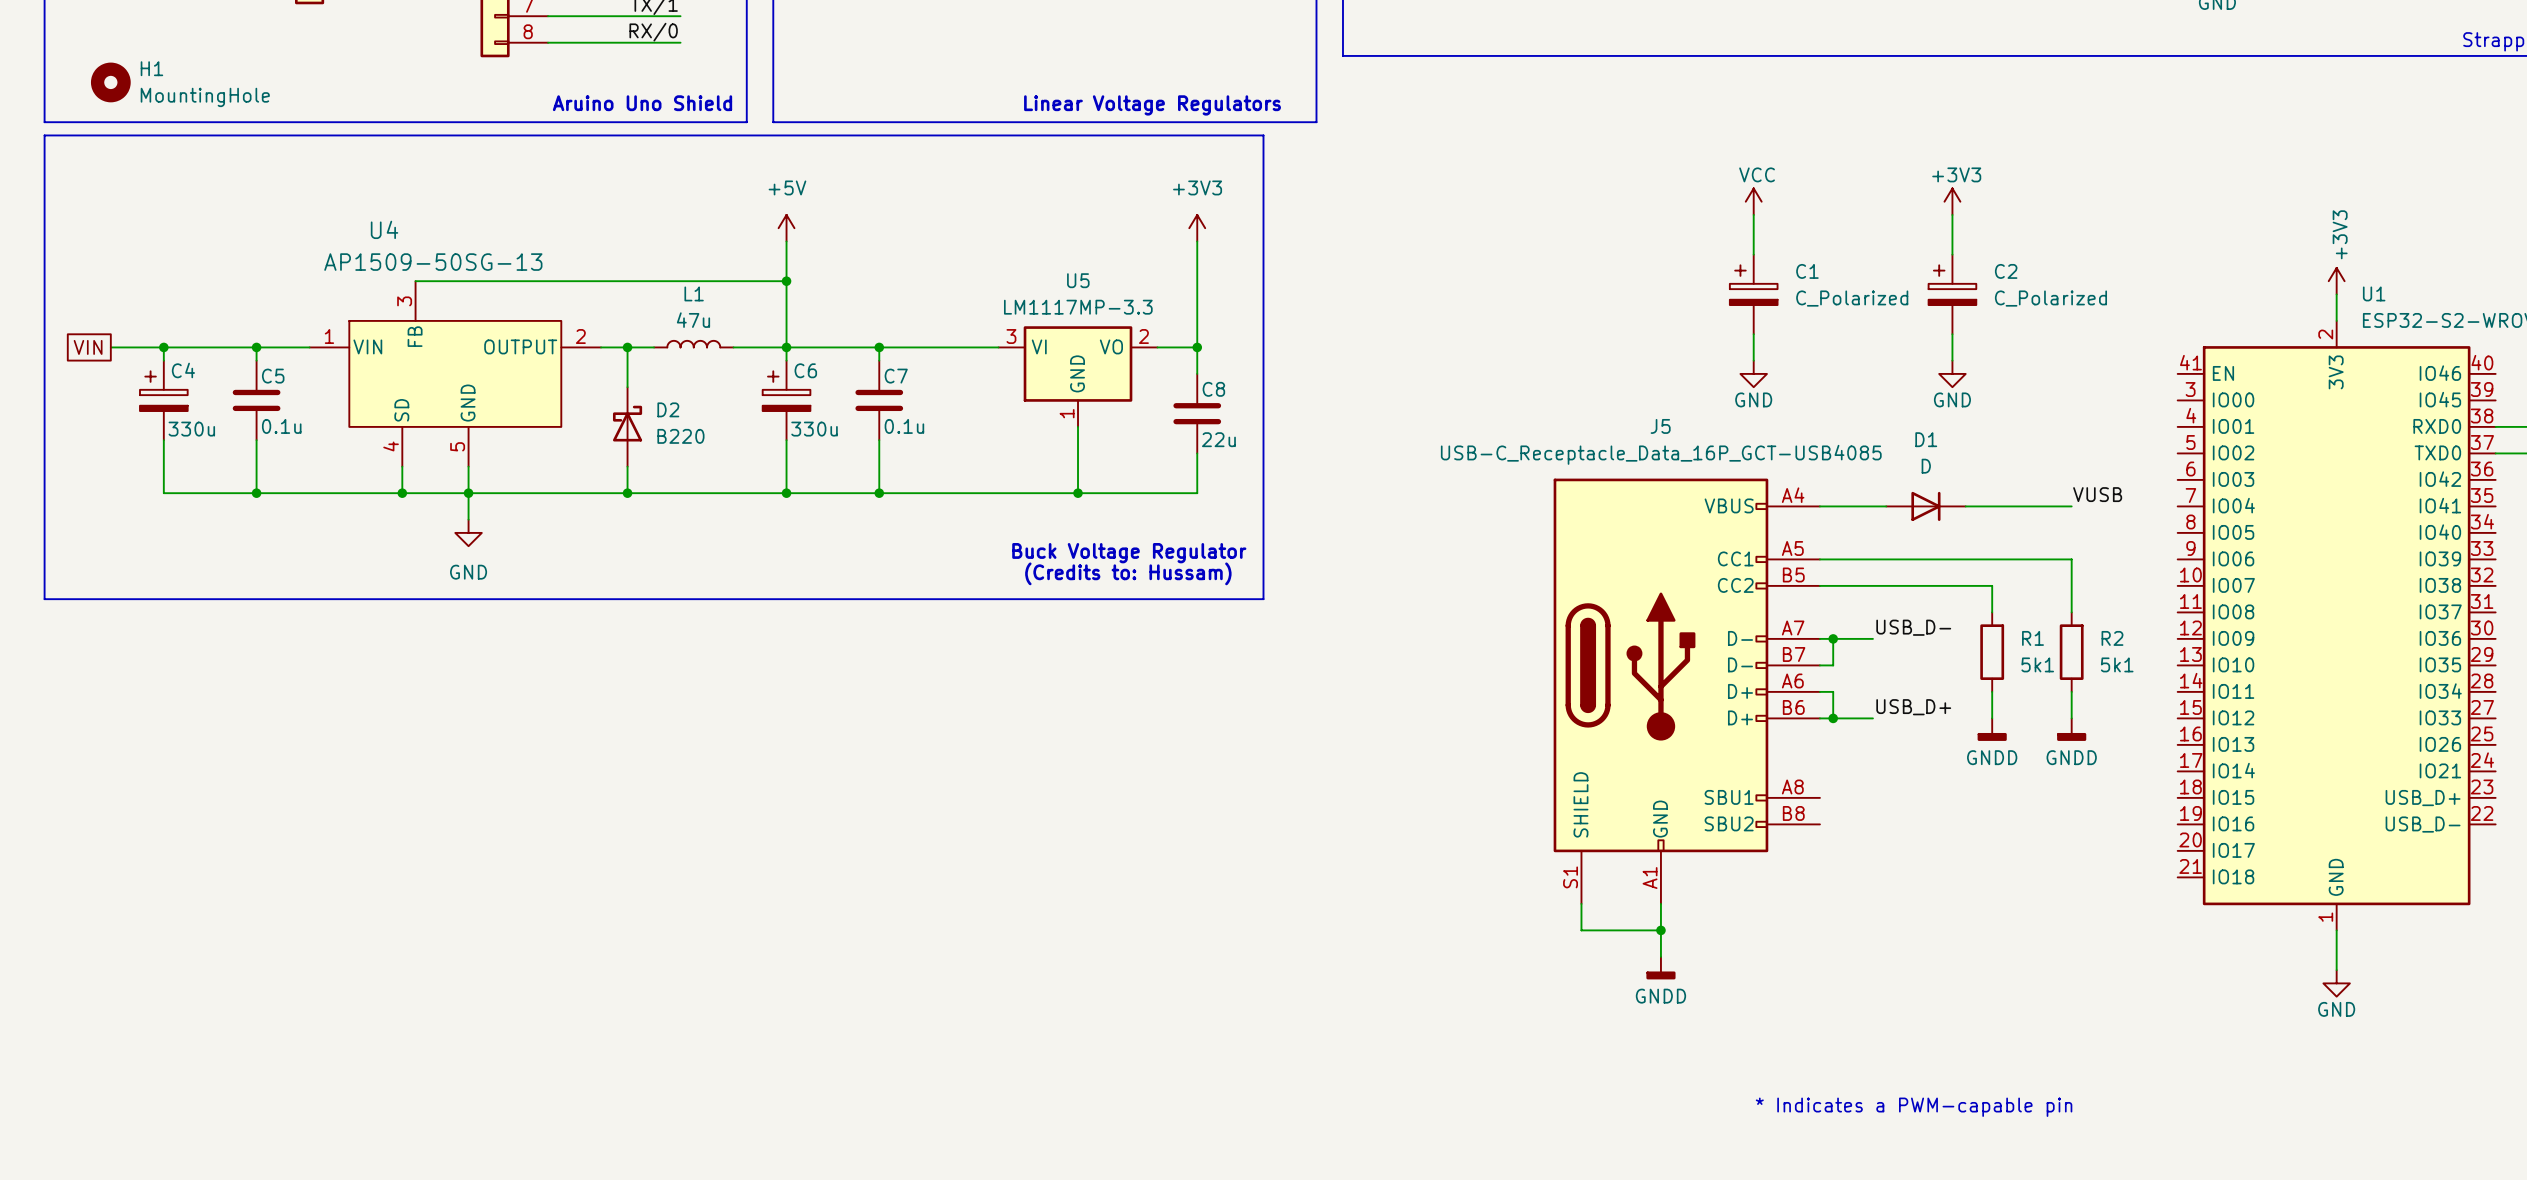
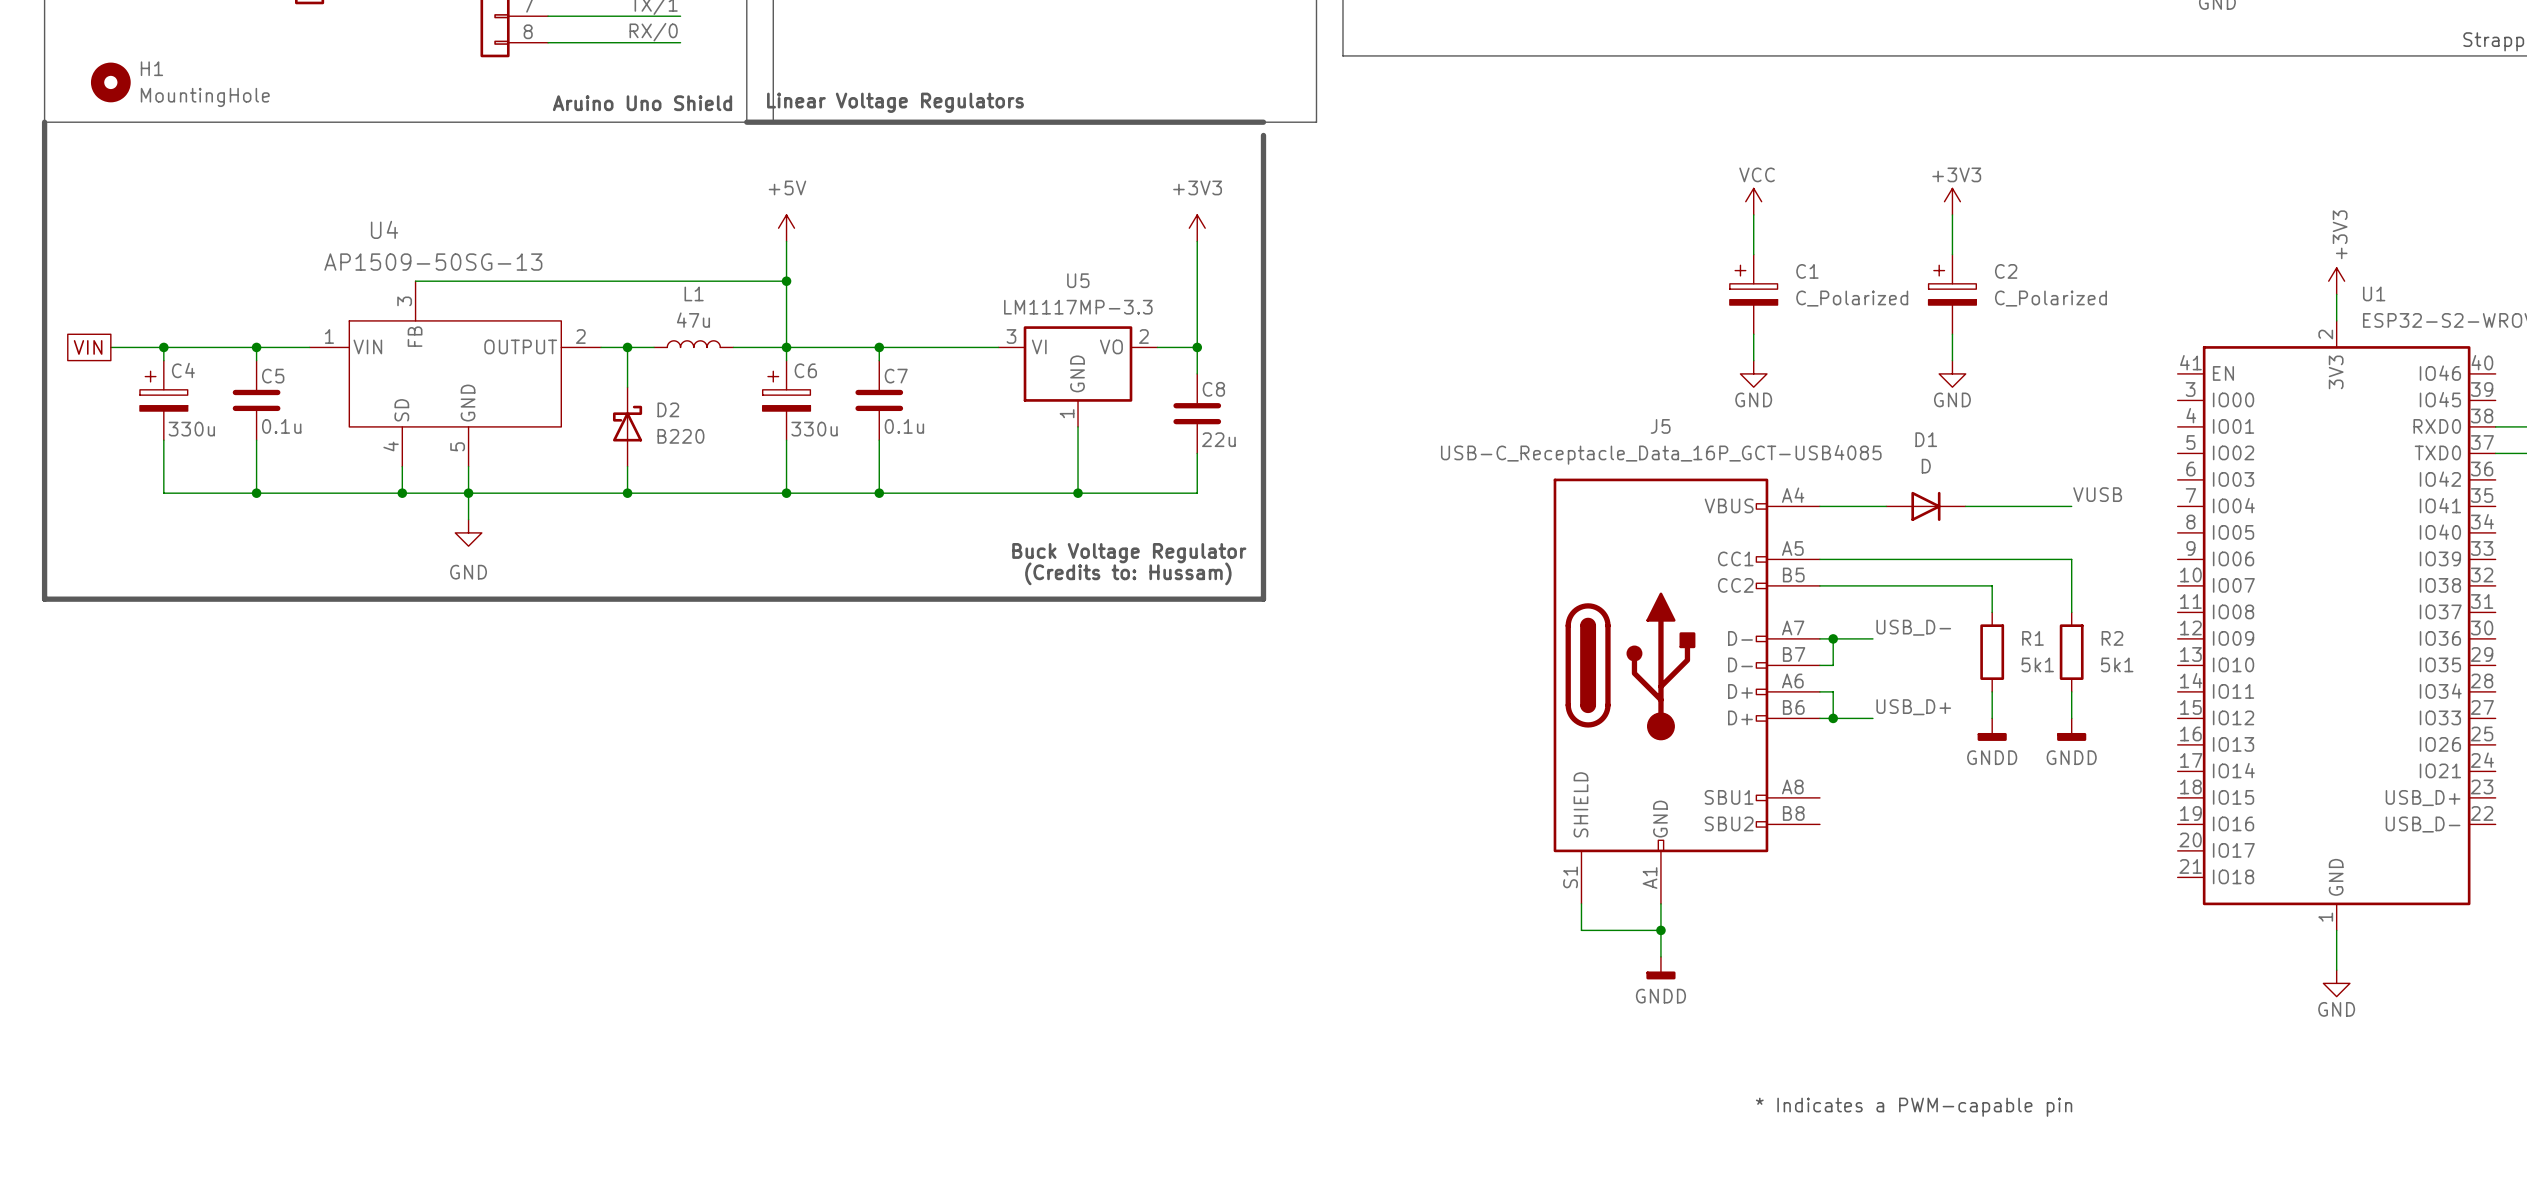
text position: Linear Voltage Regulators (1152, 105) -> Linear Voltage Regulators (895, 102)
line: none -> (746, 122) (773, 122)
line width: thin (773, 122) (1263, 122) -> thick (773, 122) (1263, 122)
line: (44, 135) (1263, 135) -> (44, 135) (44, 122)
line width: thin (44, 135) (44, 599) (1263, 599) (1263, 135) -> thick (44, 135) (44, 599) (1263, 599) (1263, 135)

